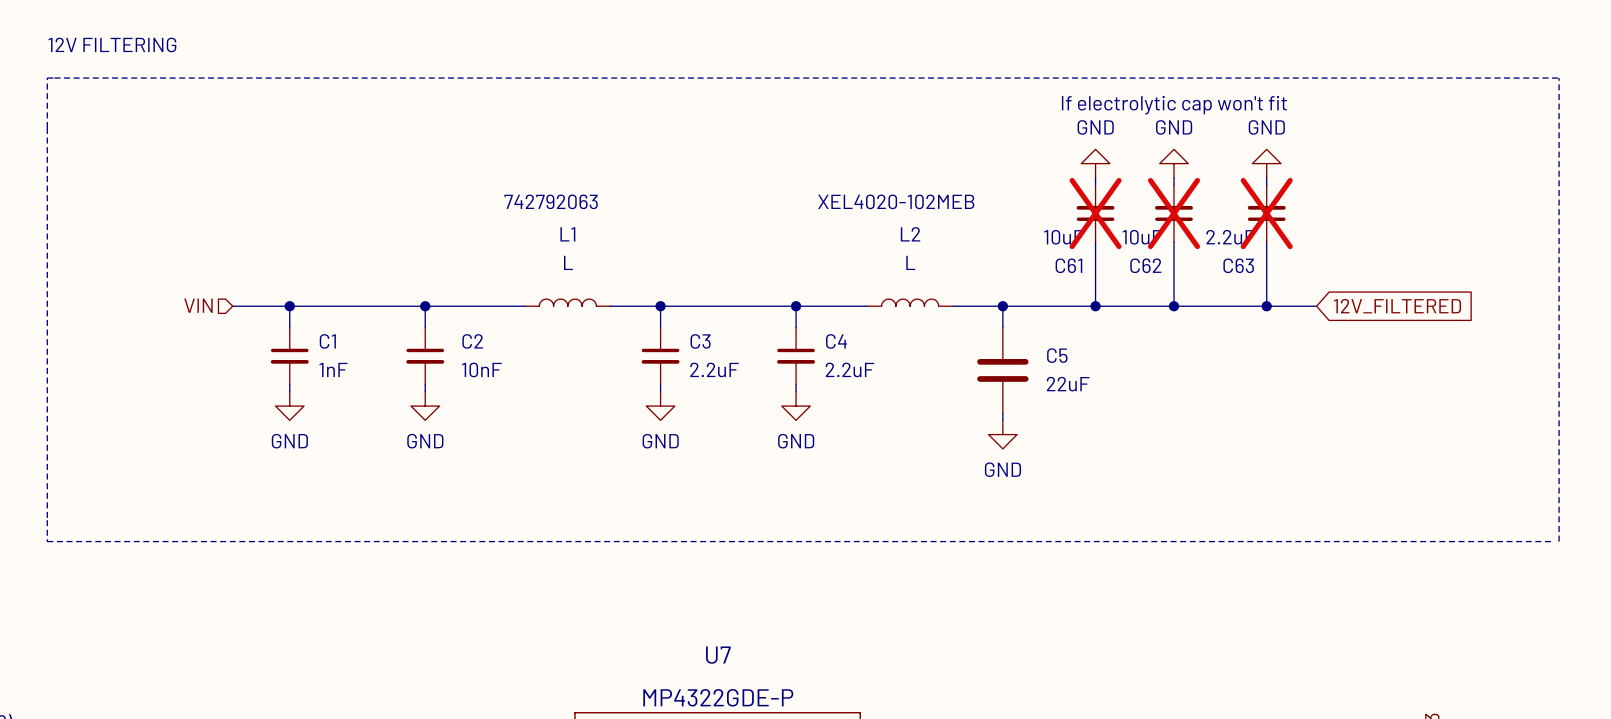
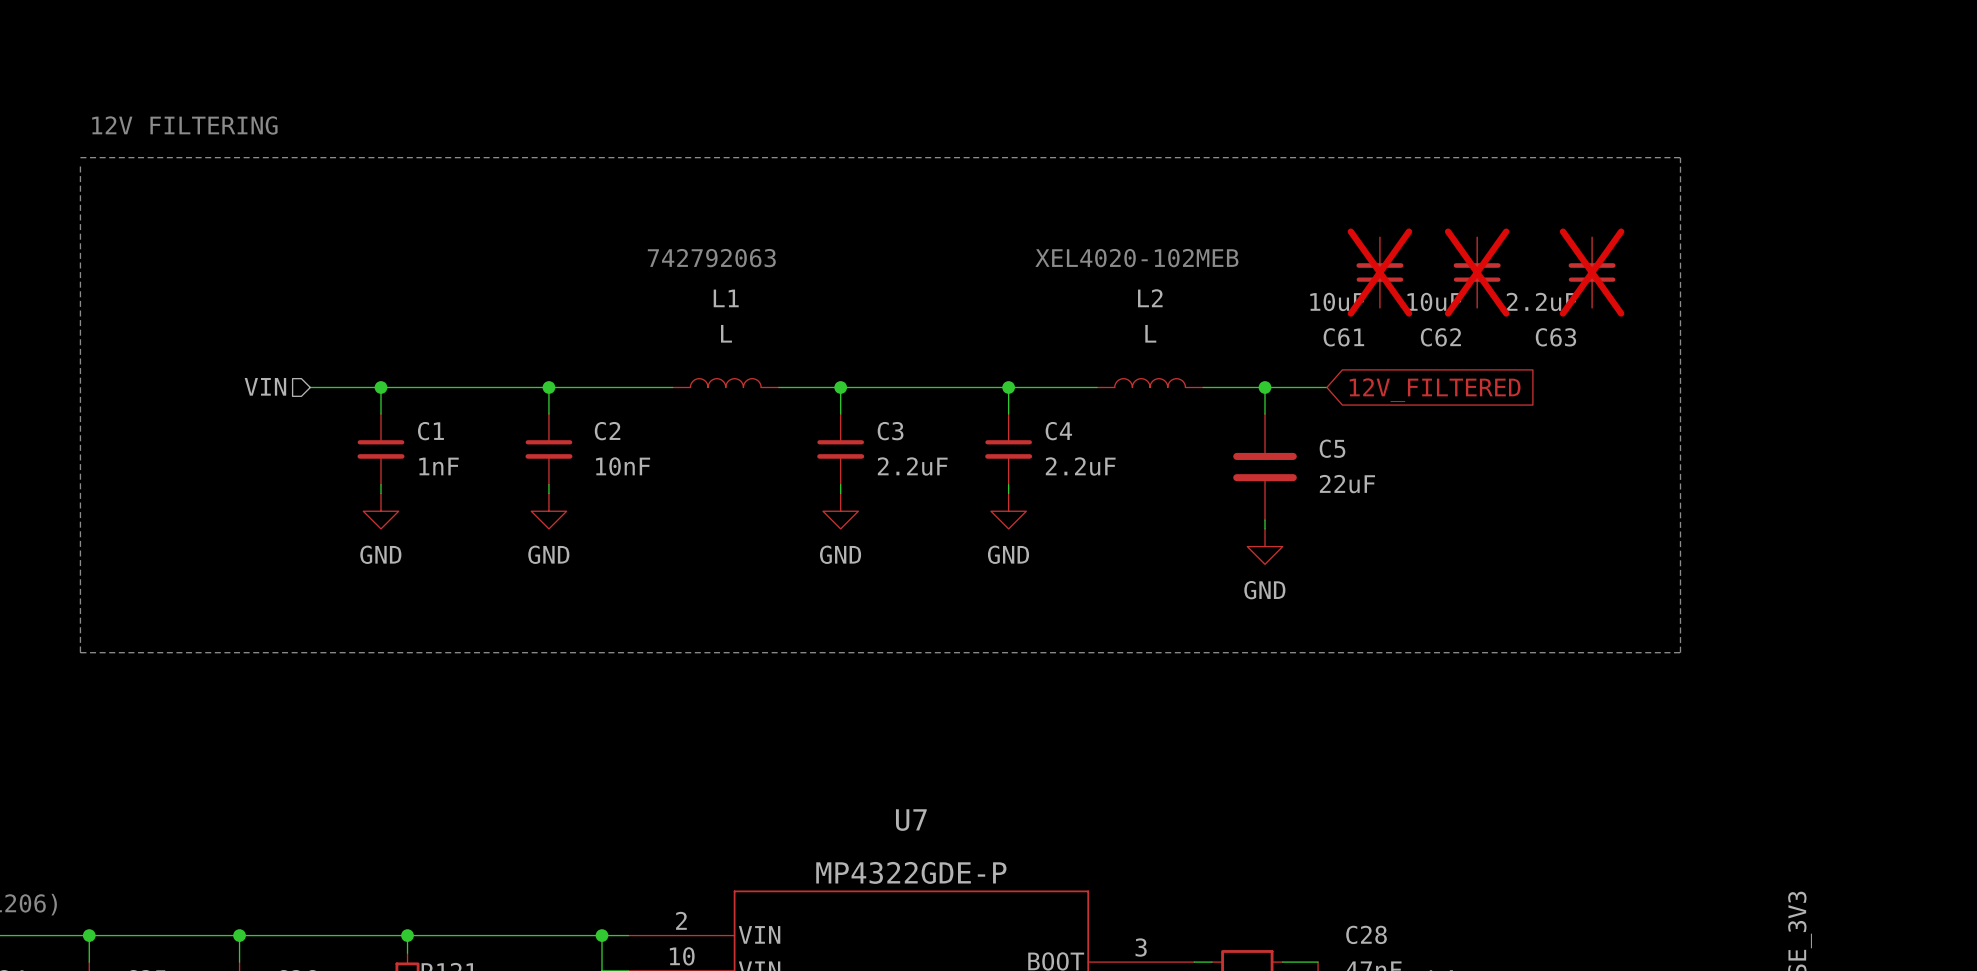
text position: 12V FILTERING (112, 44) -> 12V FILTERING (184, 125)
text: If electrolytic cap won't fit (1174, 105) -> none
line: (47, 127) (47, 78) (1559, 78) (1559, 541) -> none
power symbol: GND (1095, 163) -> none
power symbol: GND (1174, 163) -> none
power symbol: GND (1266, 163) -> none
wire: (1095, 177) (1095, 185) -> none
wire: (1174, 177) (1174, 185) -> none
wire: (1266, 177) (1266, 185) -> none
wire: (1095, 242) (1095, 306) -> none
wire: (1174, 242) (1174, 306) -> none
wire: (1266, 242) (1266, 306) -> none
wire: (1052, 306) (1316, 306) -> none
junction: (1095, 306) -> none
junction: (1174, 306) -> none
junction: (1266, 306) -> none
global label position: 12V_FILTERED (1397, 306) -> 12V_FILTERED (1435, 390)
line: (47, 520) (47, 541) (1551, 541) -> (80, 652) (1680, 652) (1680, 157) (80, 157)

